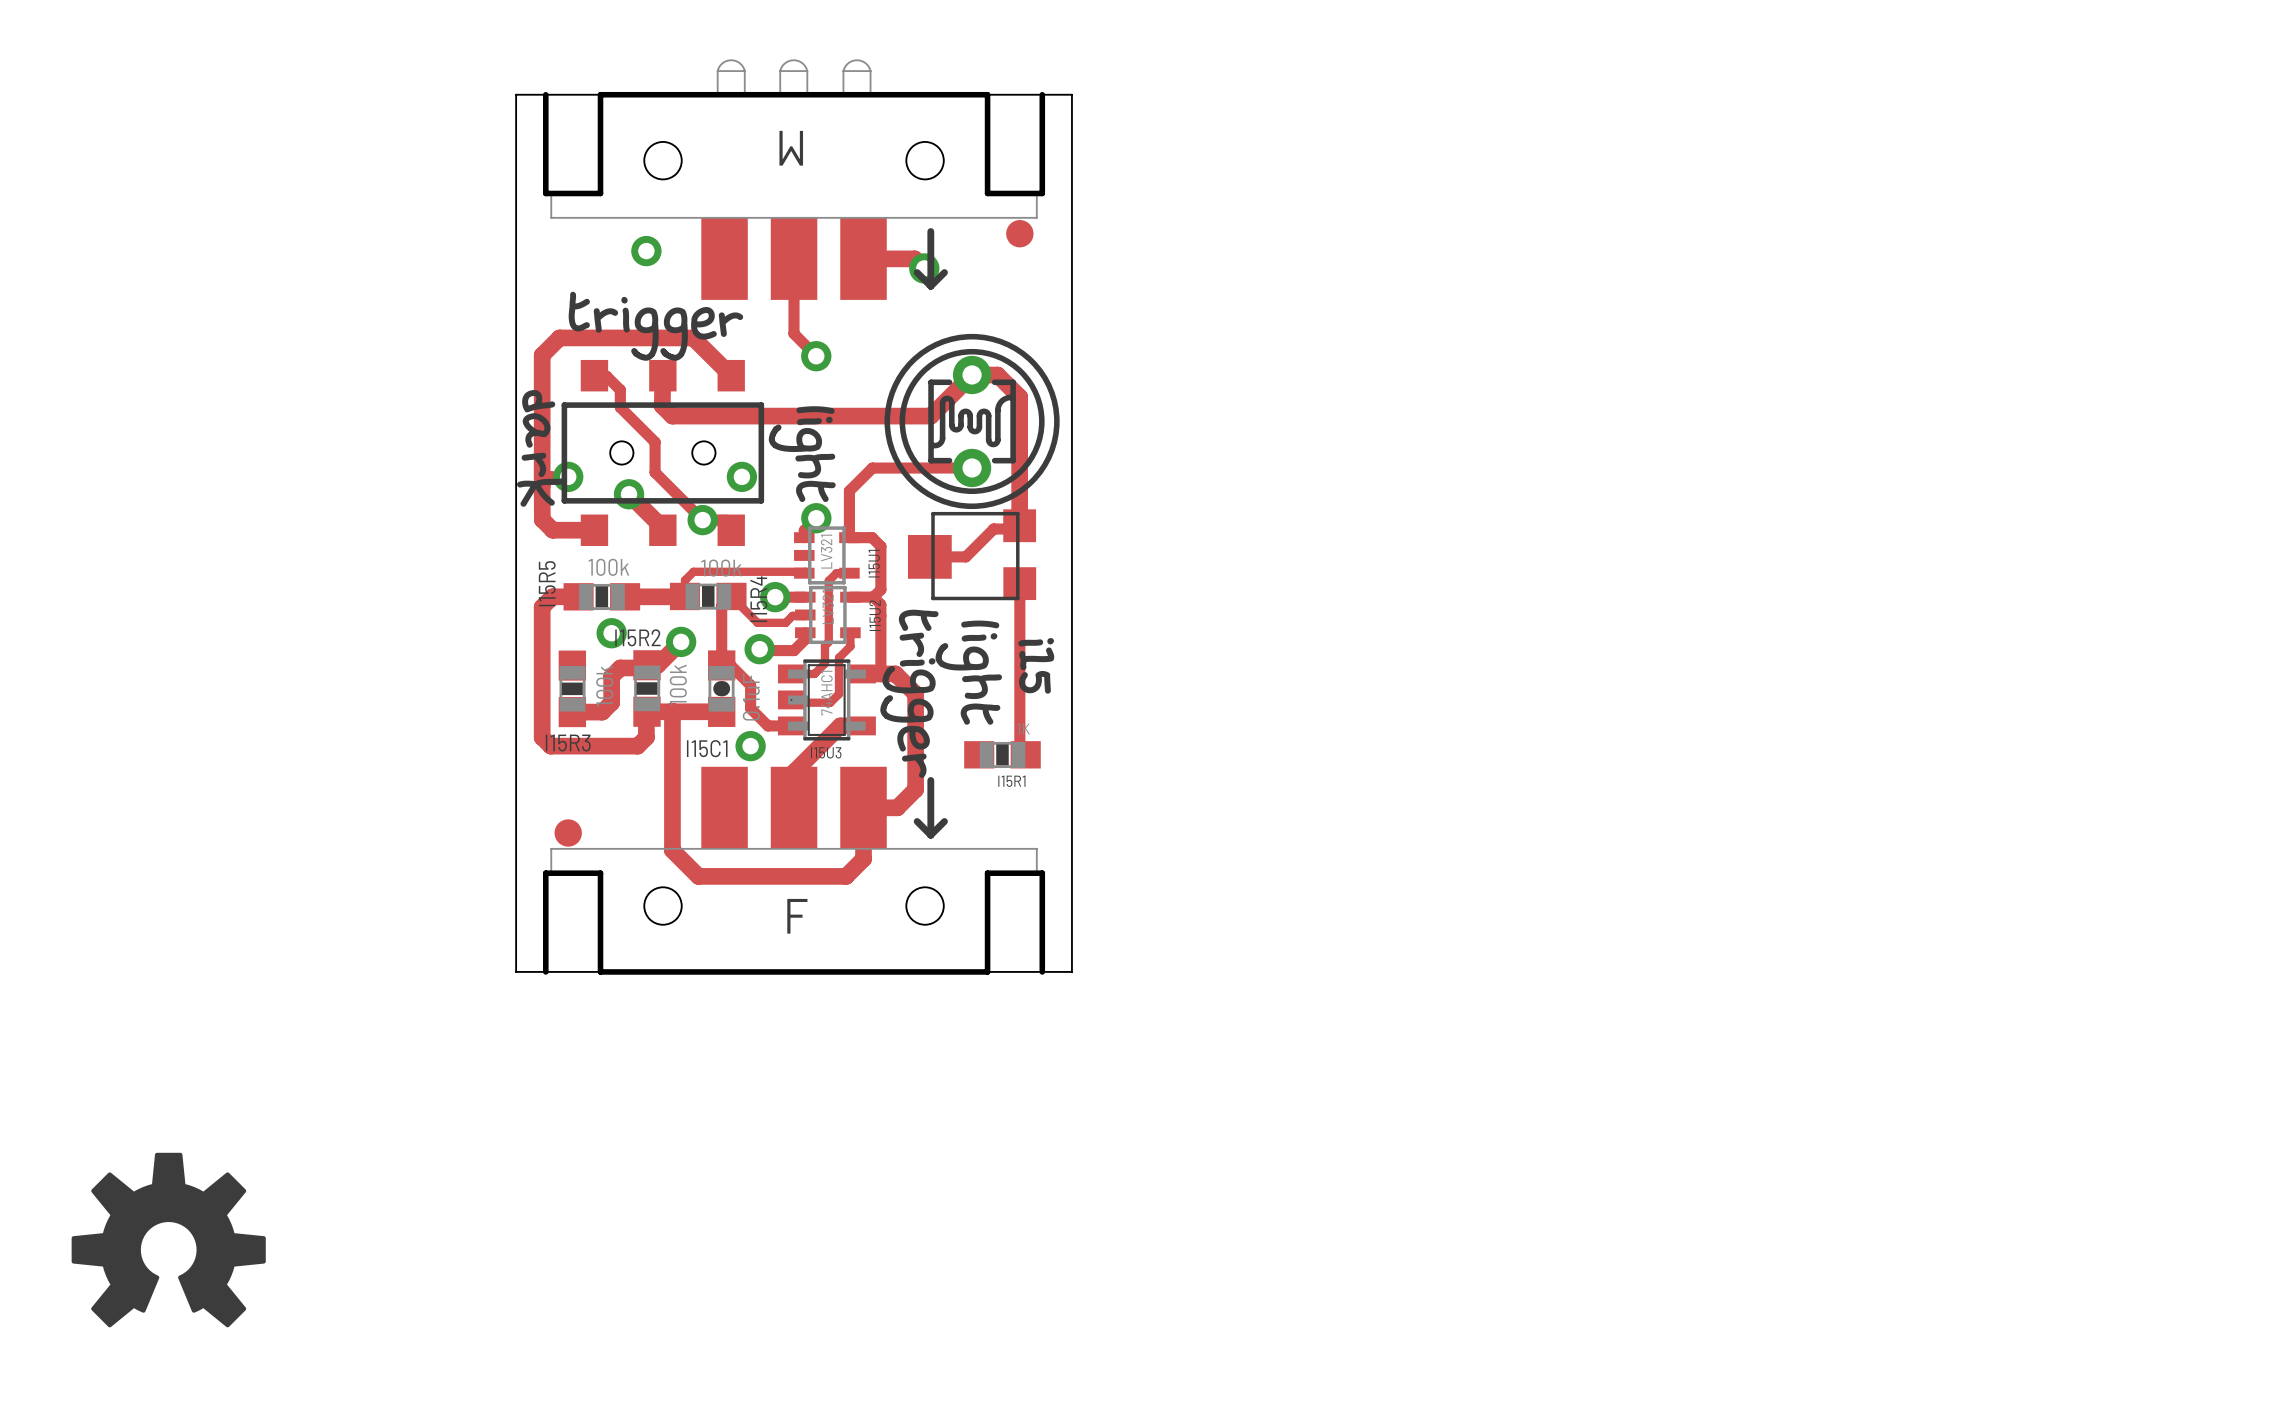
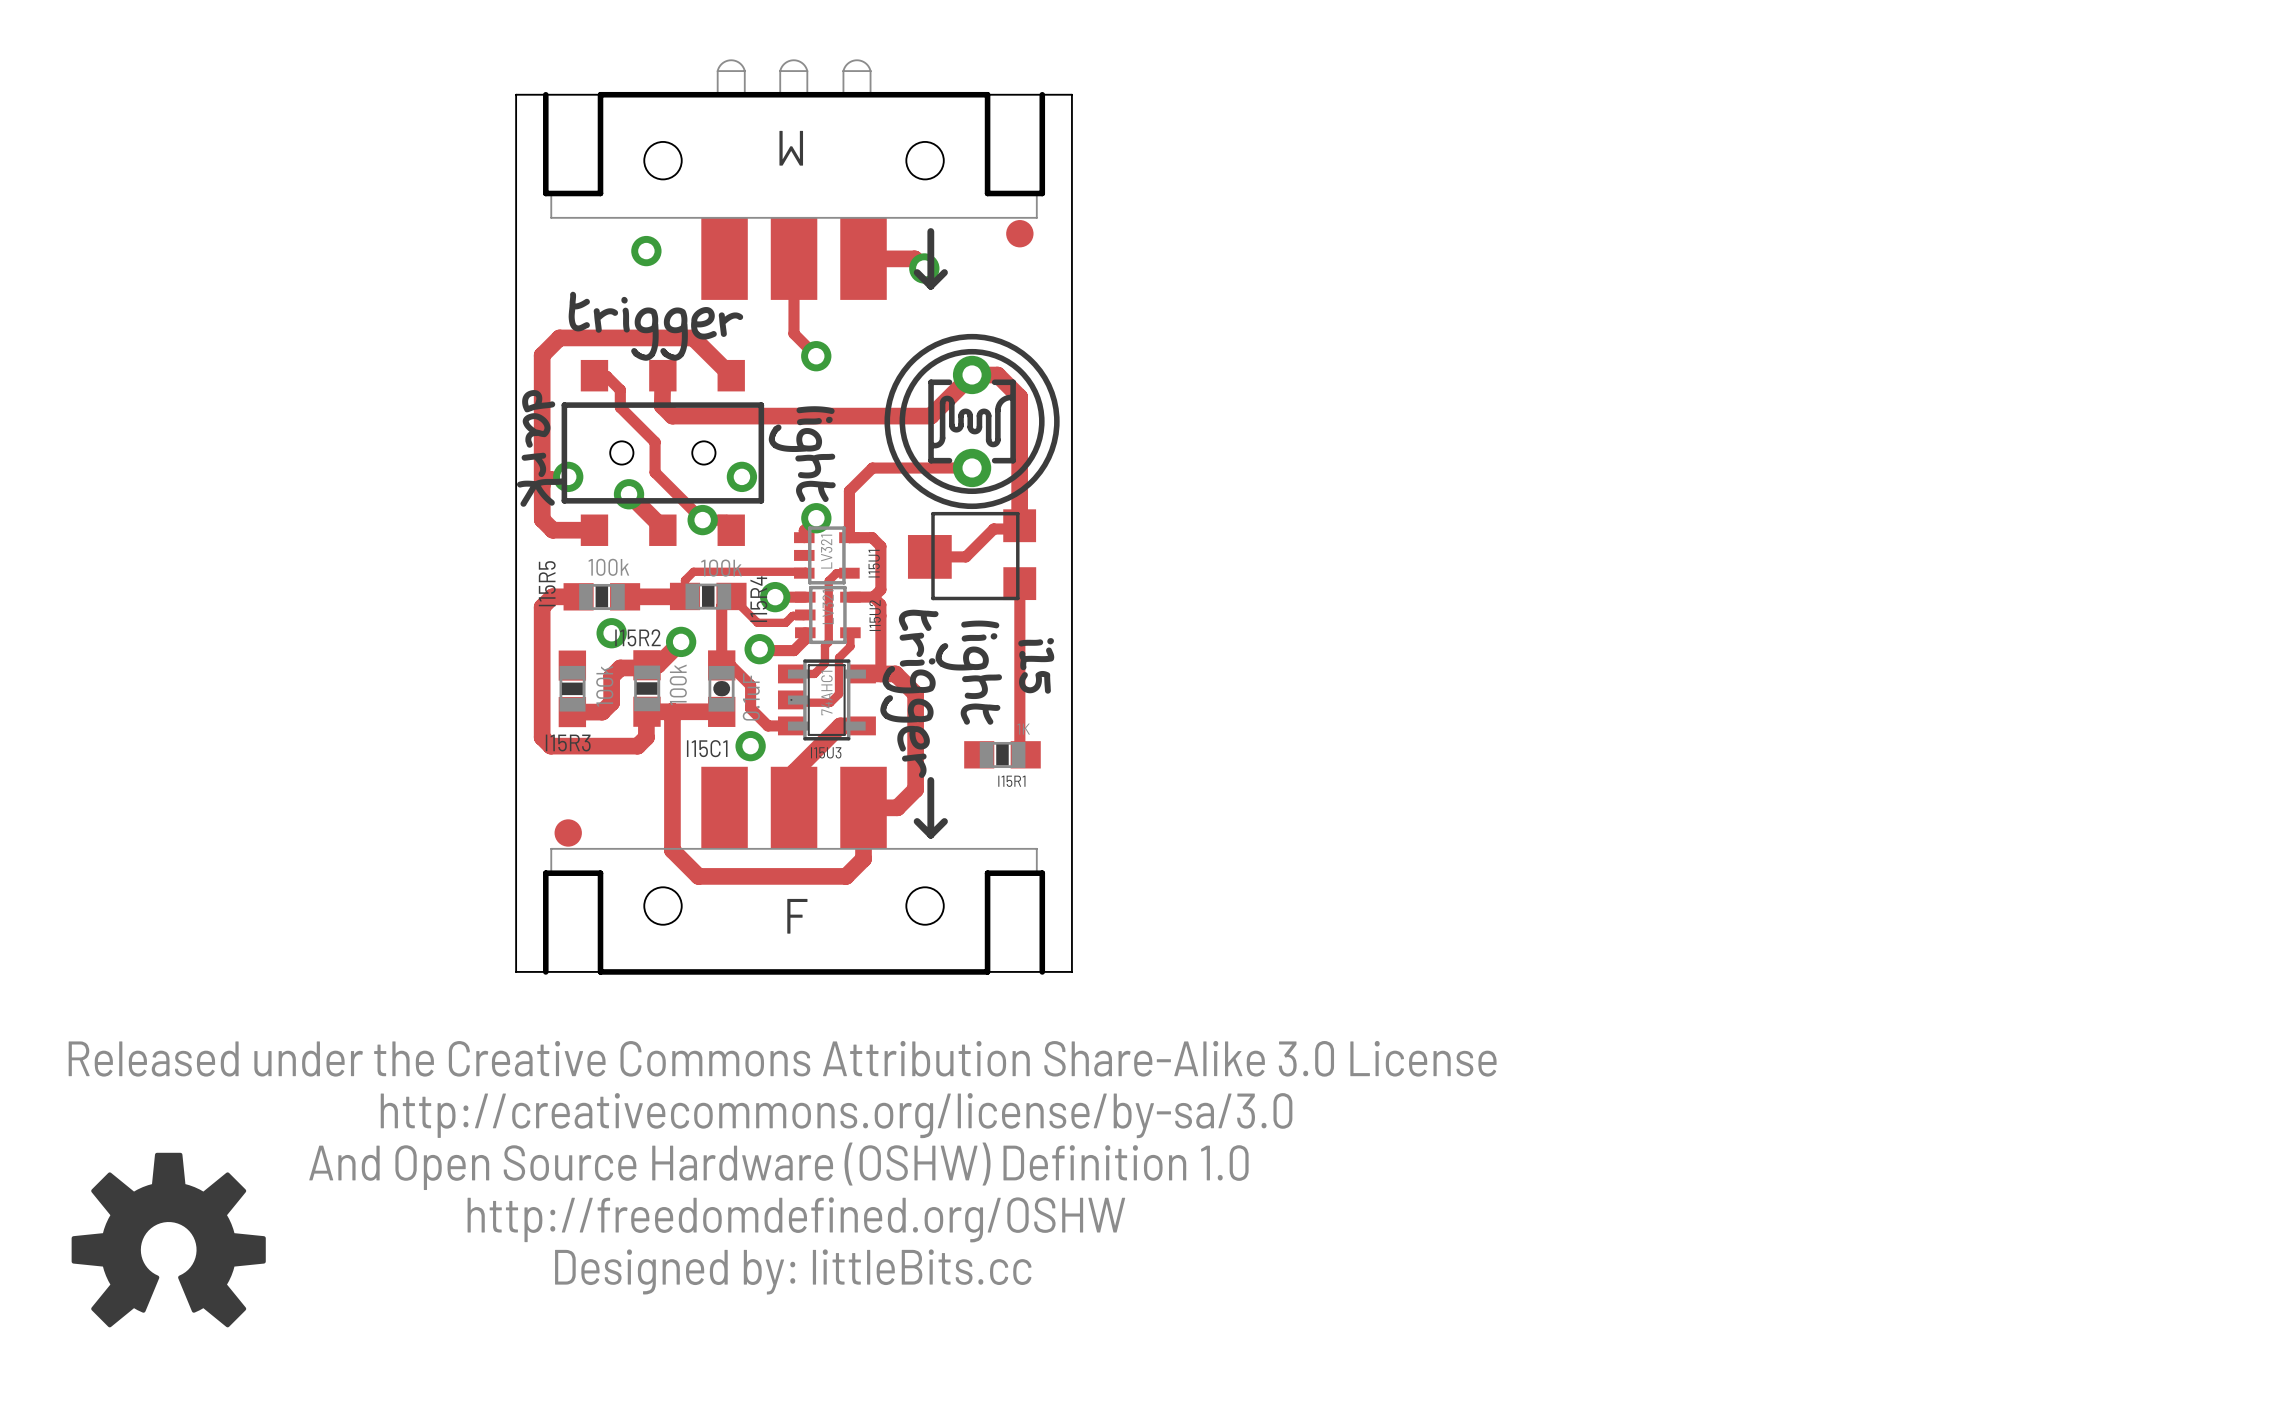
drawing: none -> [68, 1040, 1497, 1295]

